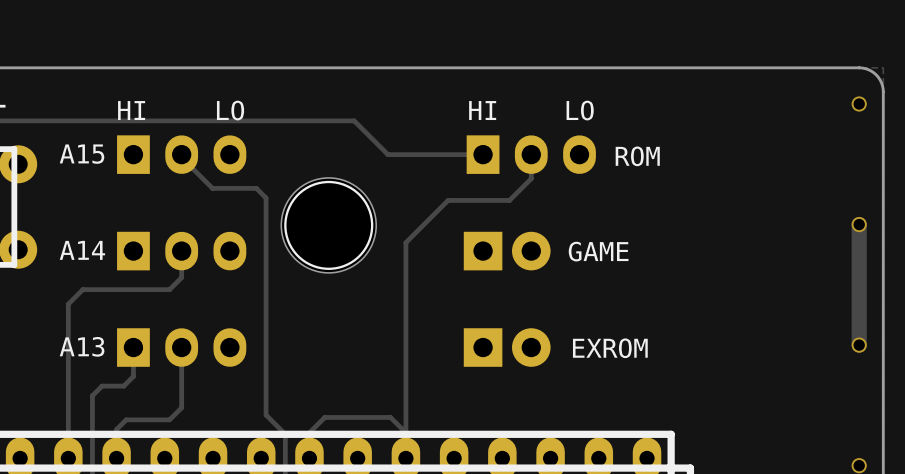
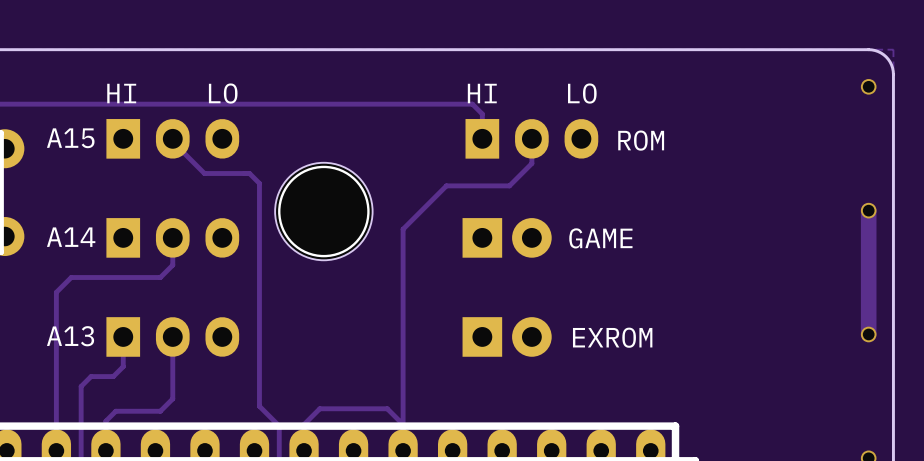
track: (354, 120) (387, 154) (483, 154) -> (350, 104) (472, 104) (482, 114) (482, 138)

